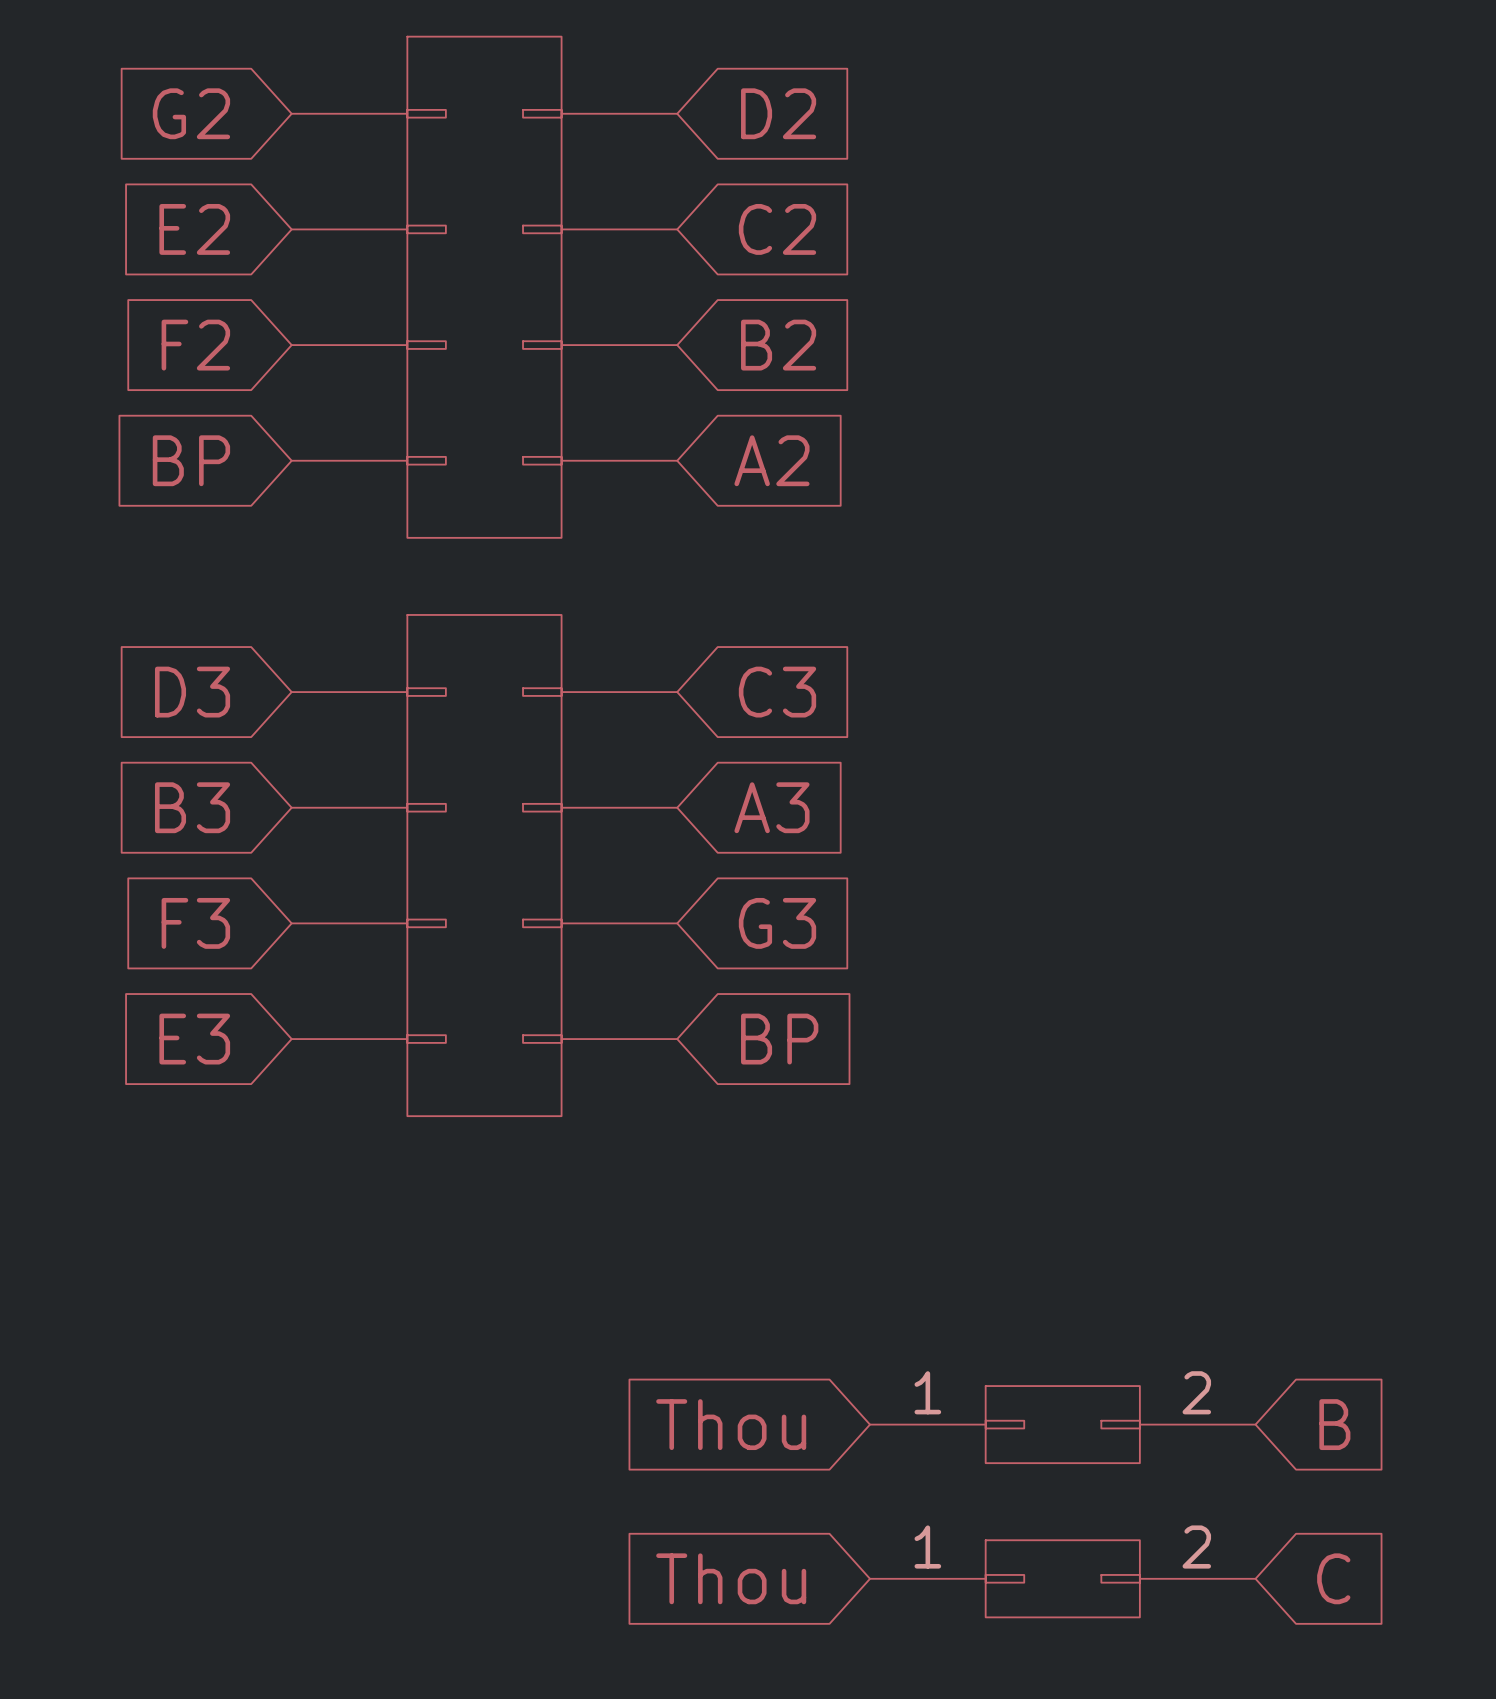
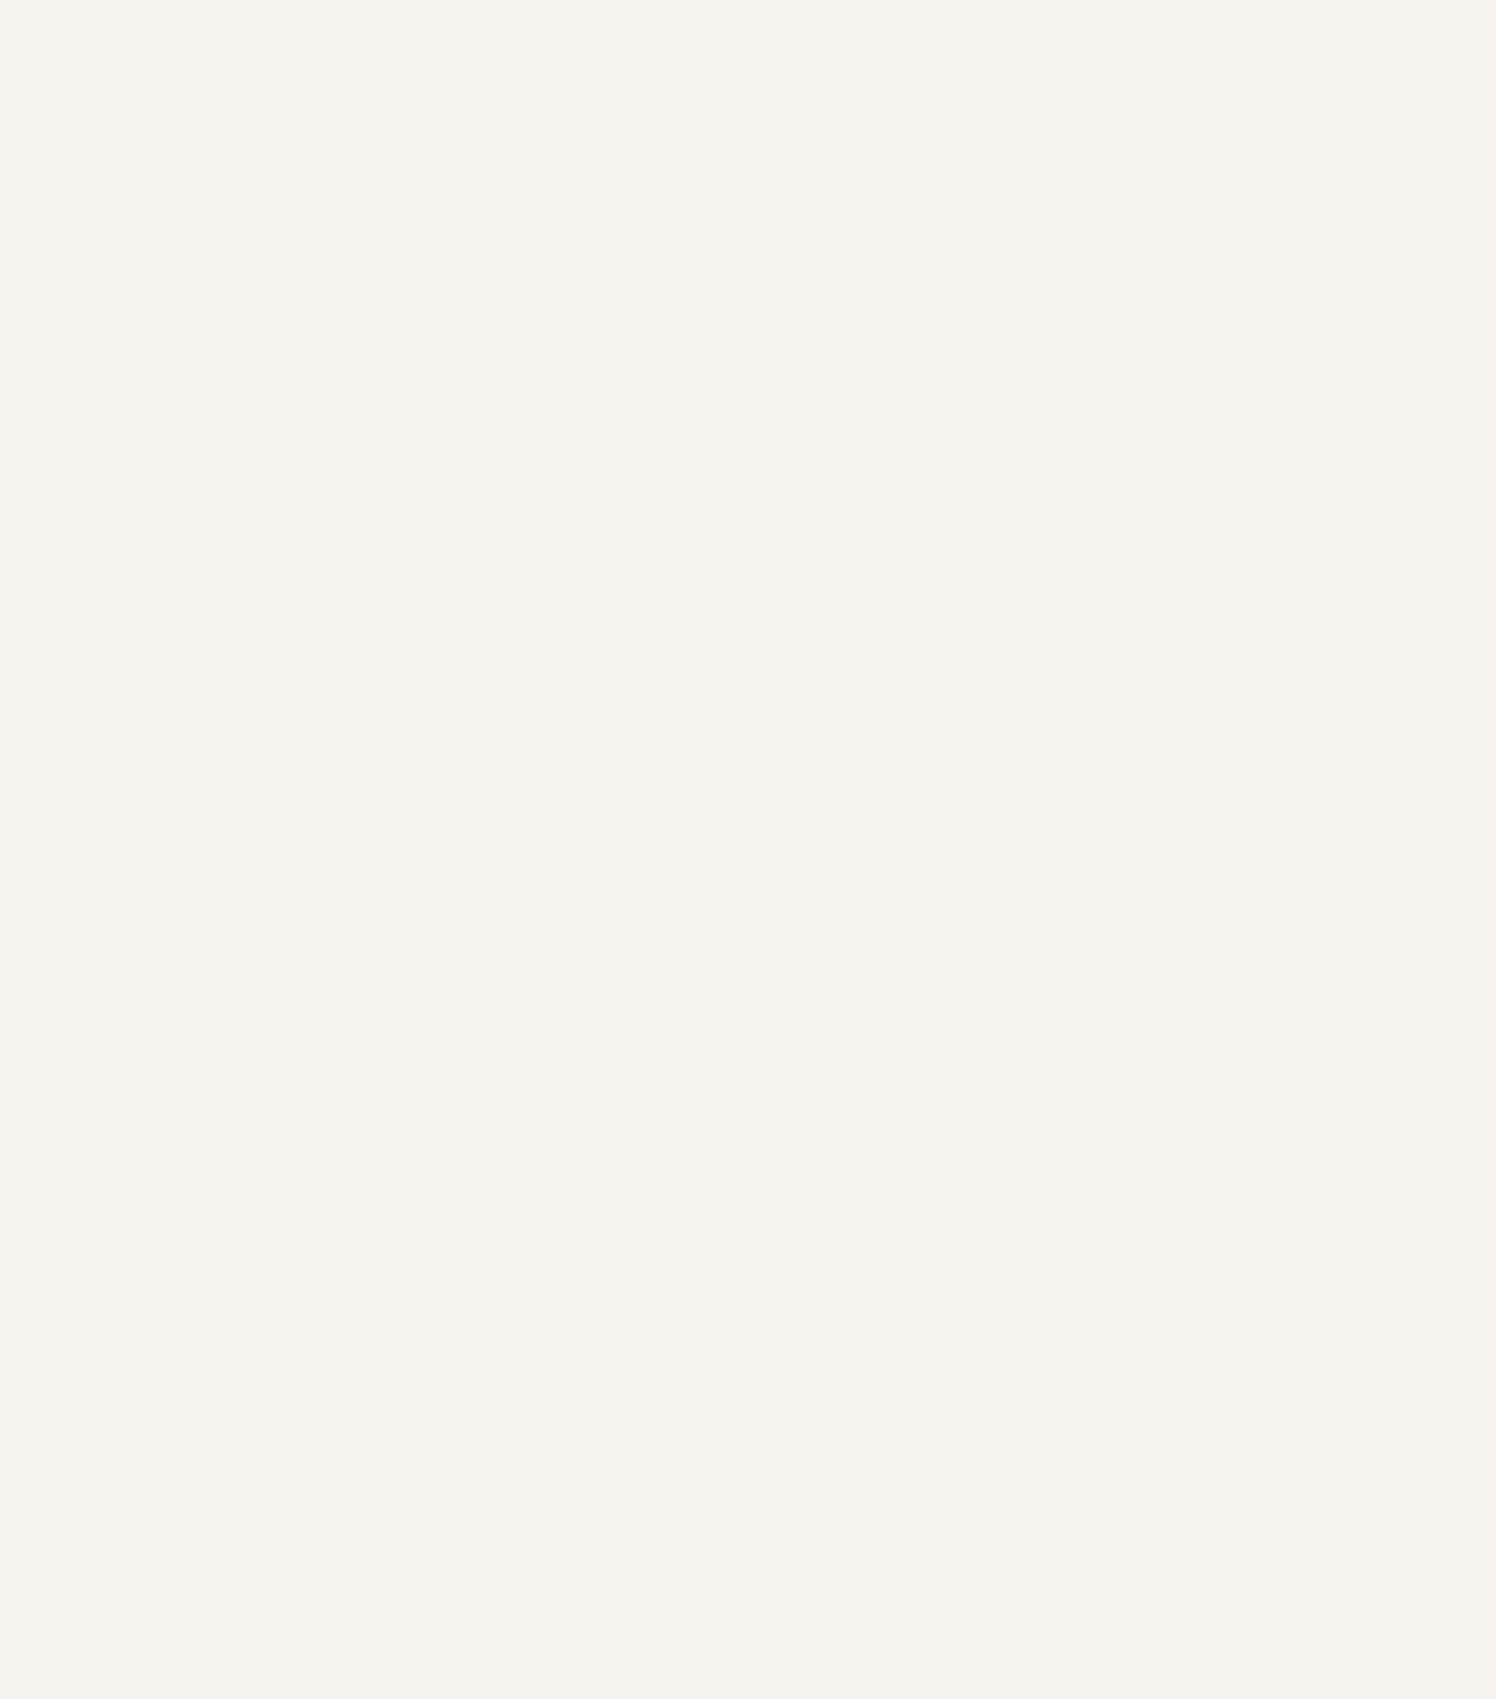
global label: G2 (191, 113) -> none
global label: D2 (778, 113) -> none
global label: E2 (194, 229) -> none
global label: C2 (777, 229) -> none
part: (484, 287) -> none
global label: F2 (195, 345) -> none
global label: B2 (778, 345) -> none
global label: BP (191, 460) -> none
global label: A2 (771, 460) -> none
global label: D3 (192, 692) -> none
global label: C3 (777, 692) -> none
global label: B3 (192, 807) -> none
global label: A3 (771, 807) -> none
part: (484, 865) -> none
global label: F3 (195, 923) -> none
global label: G3 (777, 923) -> none
global label: E3 (194, 1039) -> none
global label: BP (779, 1039) -> none
global label: Thou (731, 1424) -> none
part: (1062, 1424) -> none
global label: B (1334, 1424) -> none
global label: Thou (731, 1578) -> none
part: (1062, 1578) -> none
global label: C (1333, 1578) -> none

